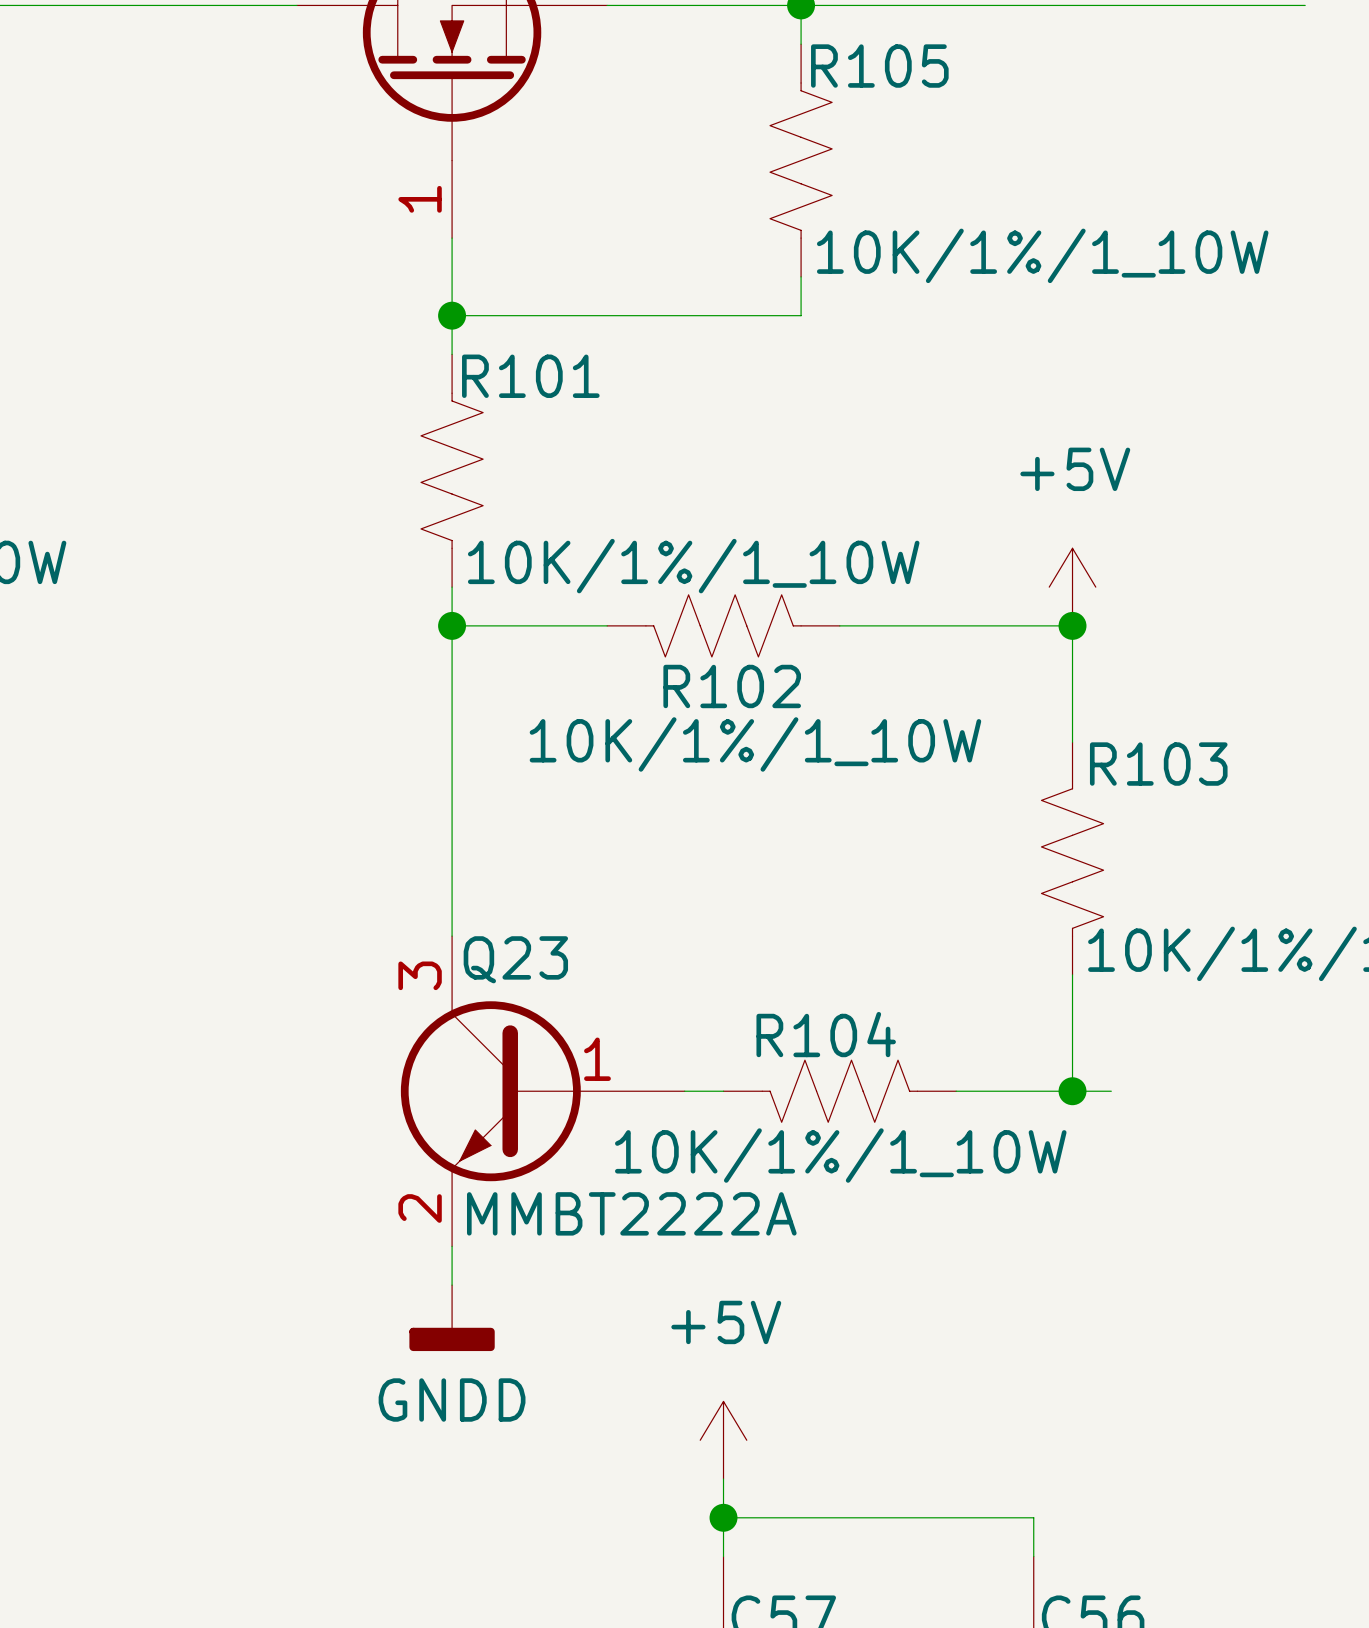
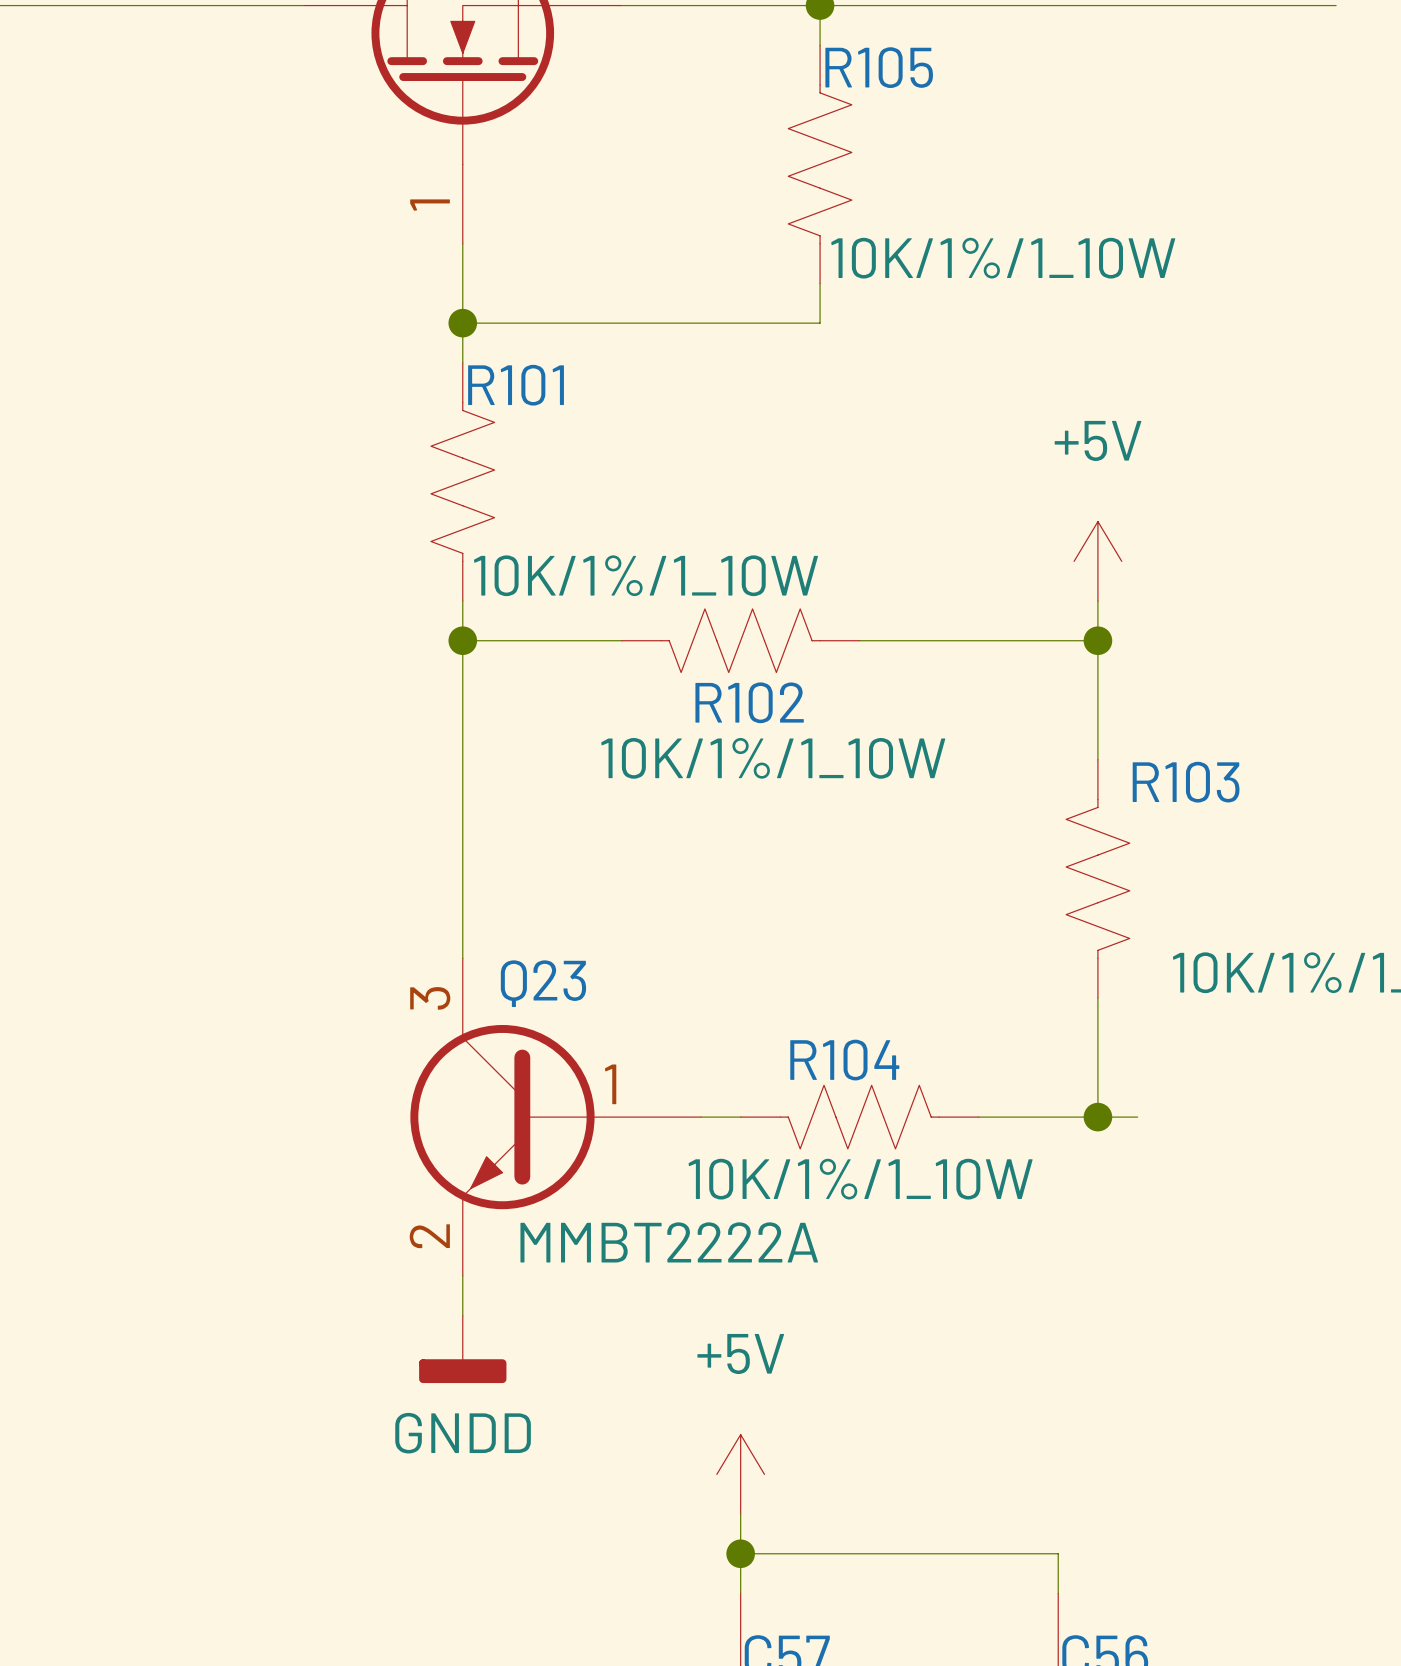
power symbol position: +5V (1072, 587) -> +5V (1097, 561)

